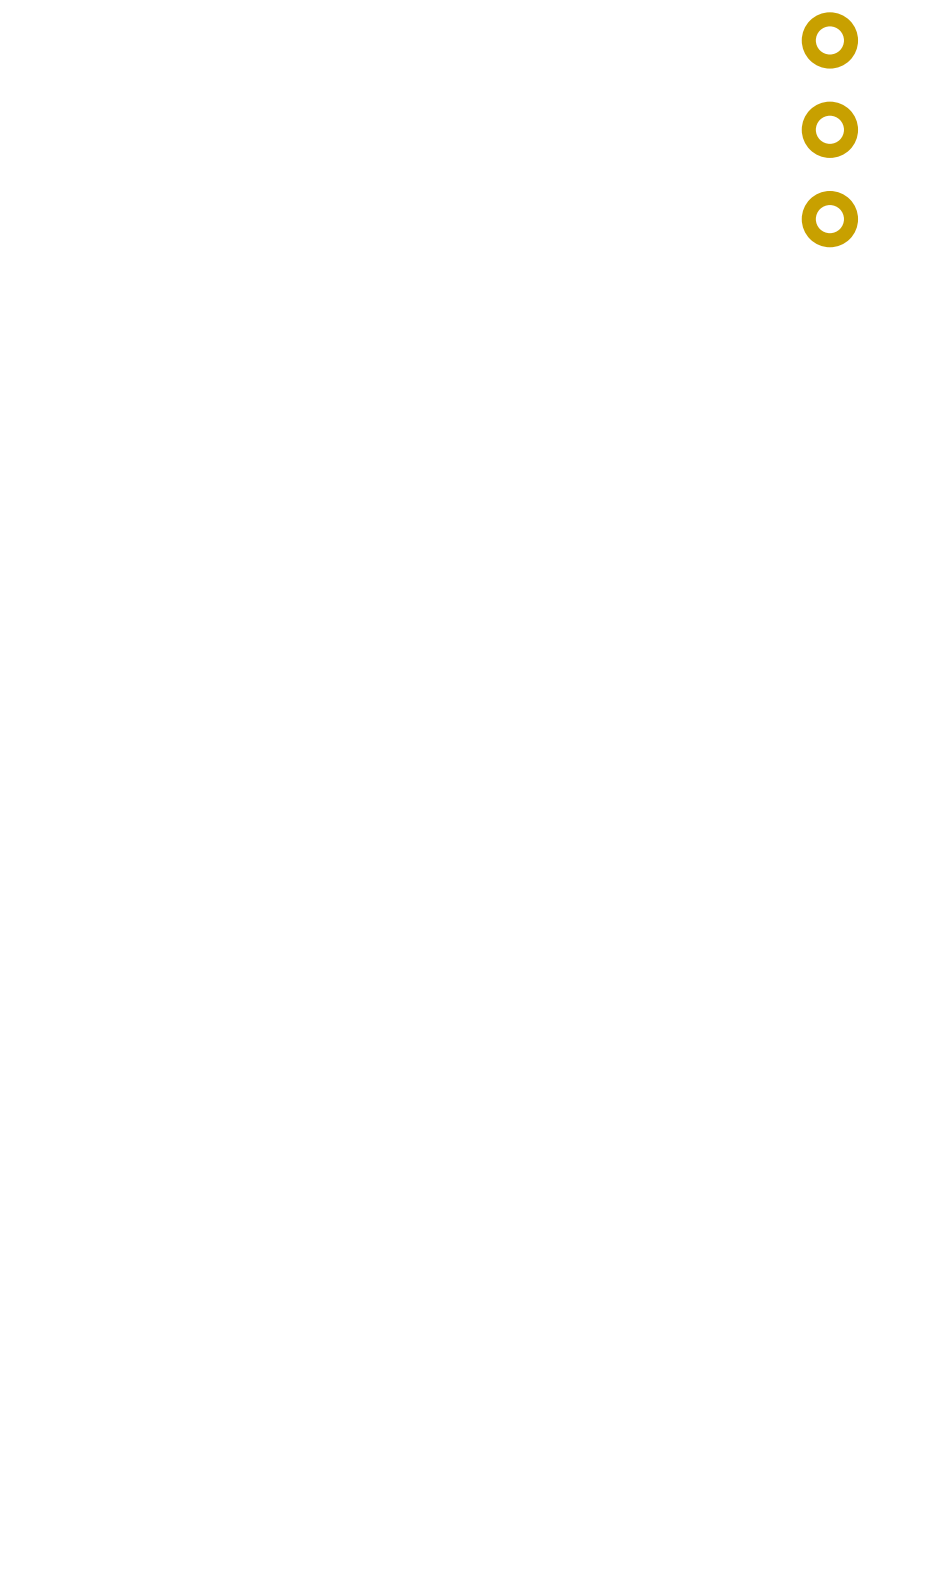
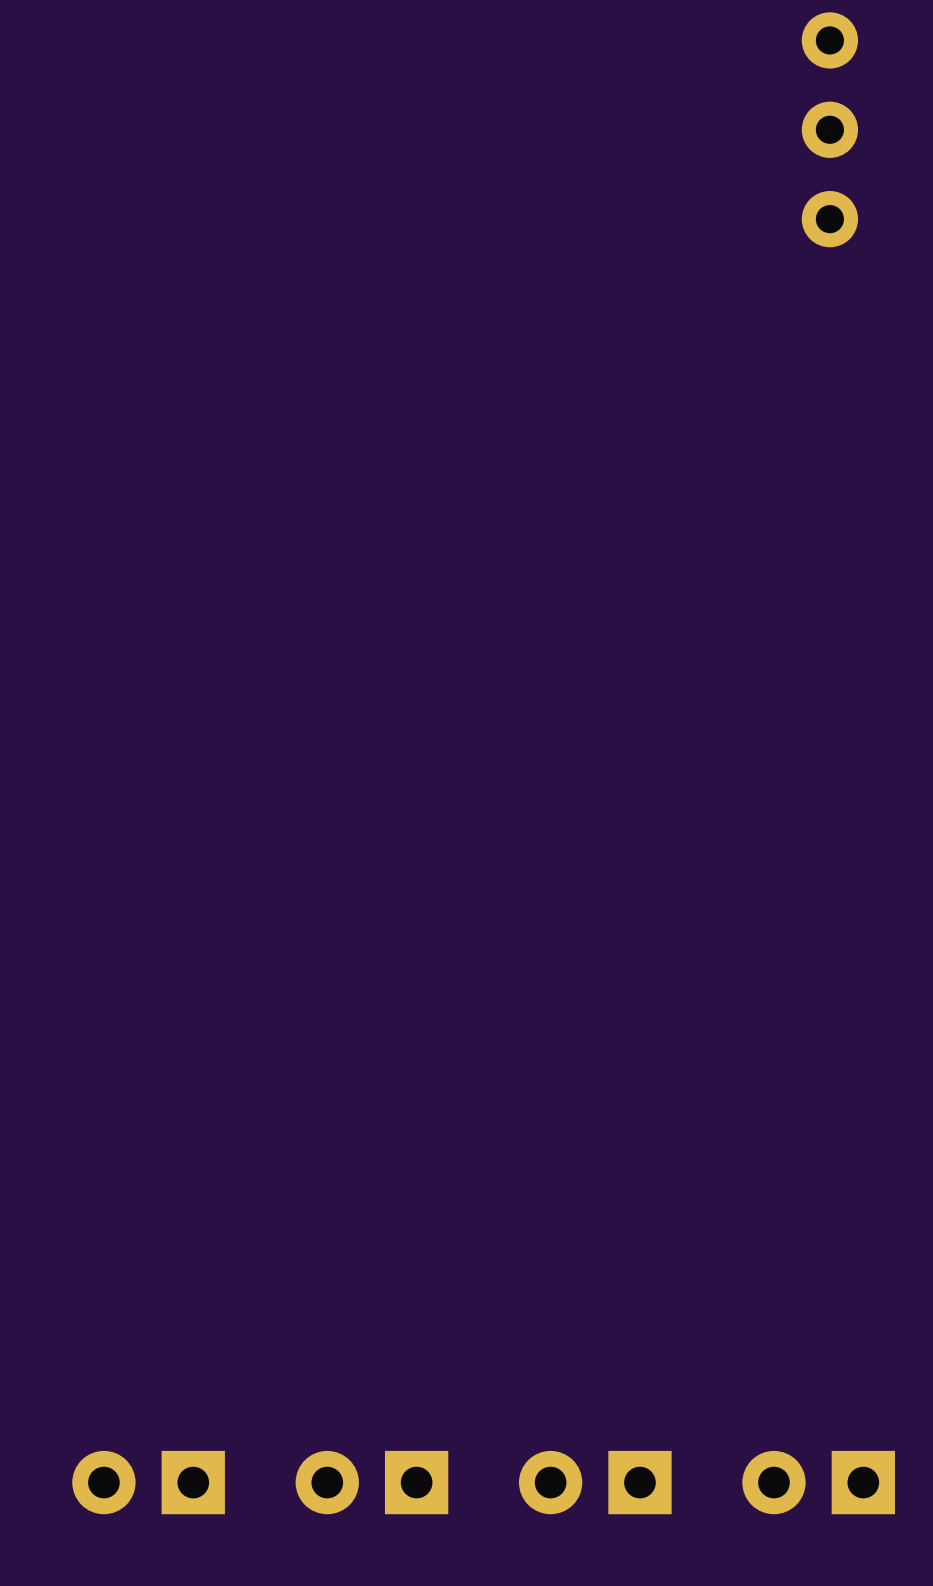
part: none -> (148, 1482)
part: none -> (371, 1482)
part: none -> (595, 1482)
part: none -> (818, 1482)

